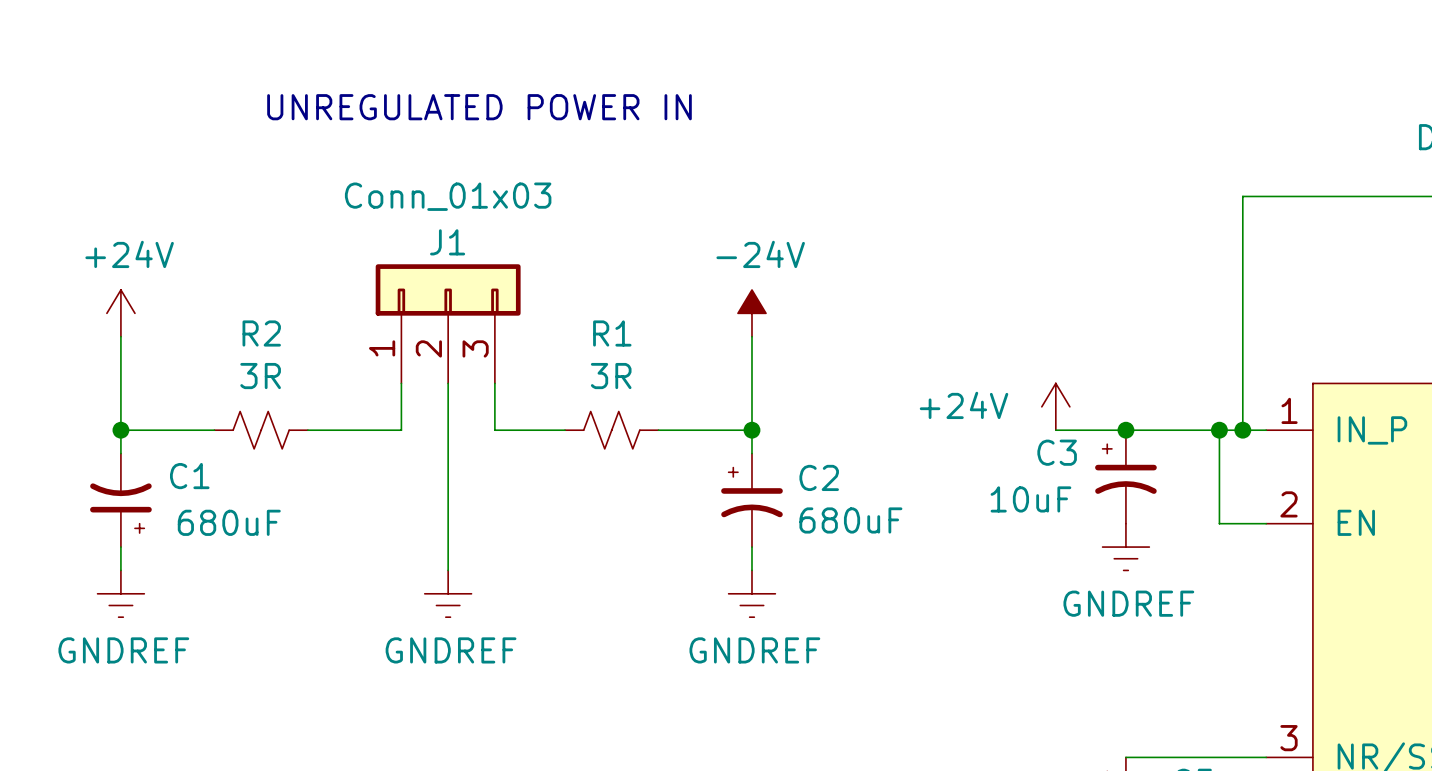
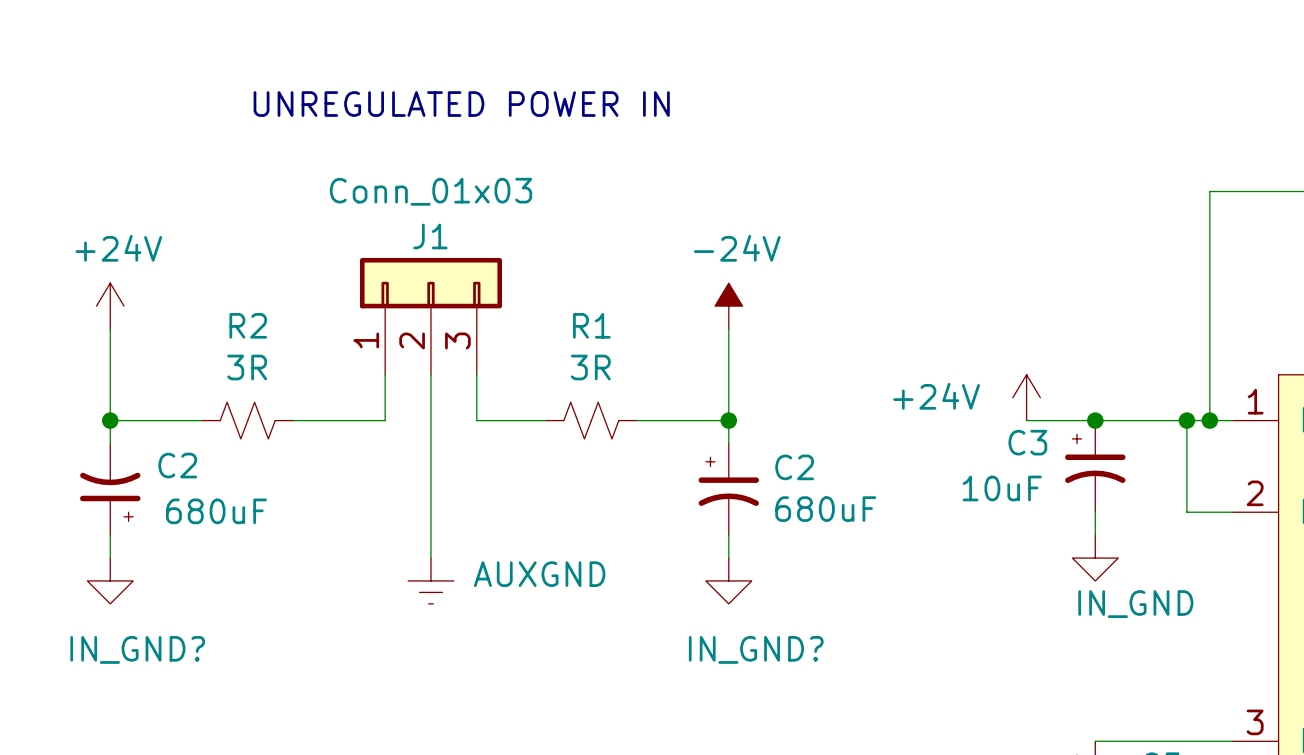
C1 name: C1 (189, 476) -> C2 (177, 465)
power symbol: GNDREF (1125, 547) -> none
IN_GND? shape: [97, 570, 145, 618] -> [87, 558, 134, 604]
IN_GND? shape: [728, 570, 776, 618] -> [705, 558, 752, 604]
IN_GND: none -> (1095, 558)
AUXGND name: none -> AUXGND (539, 574)
IN_GND? text: GNDREF (123, 650) -> none
AUXGND text: GNDREF (451, 650) -> none
IN_GND? text: GNDREF (754, 650) -> none
IN_GND? name: none -> IN_GND? (137, 649)
IN_GND? name: none -> IN_GND? (756, 649)

